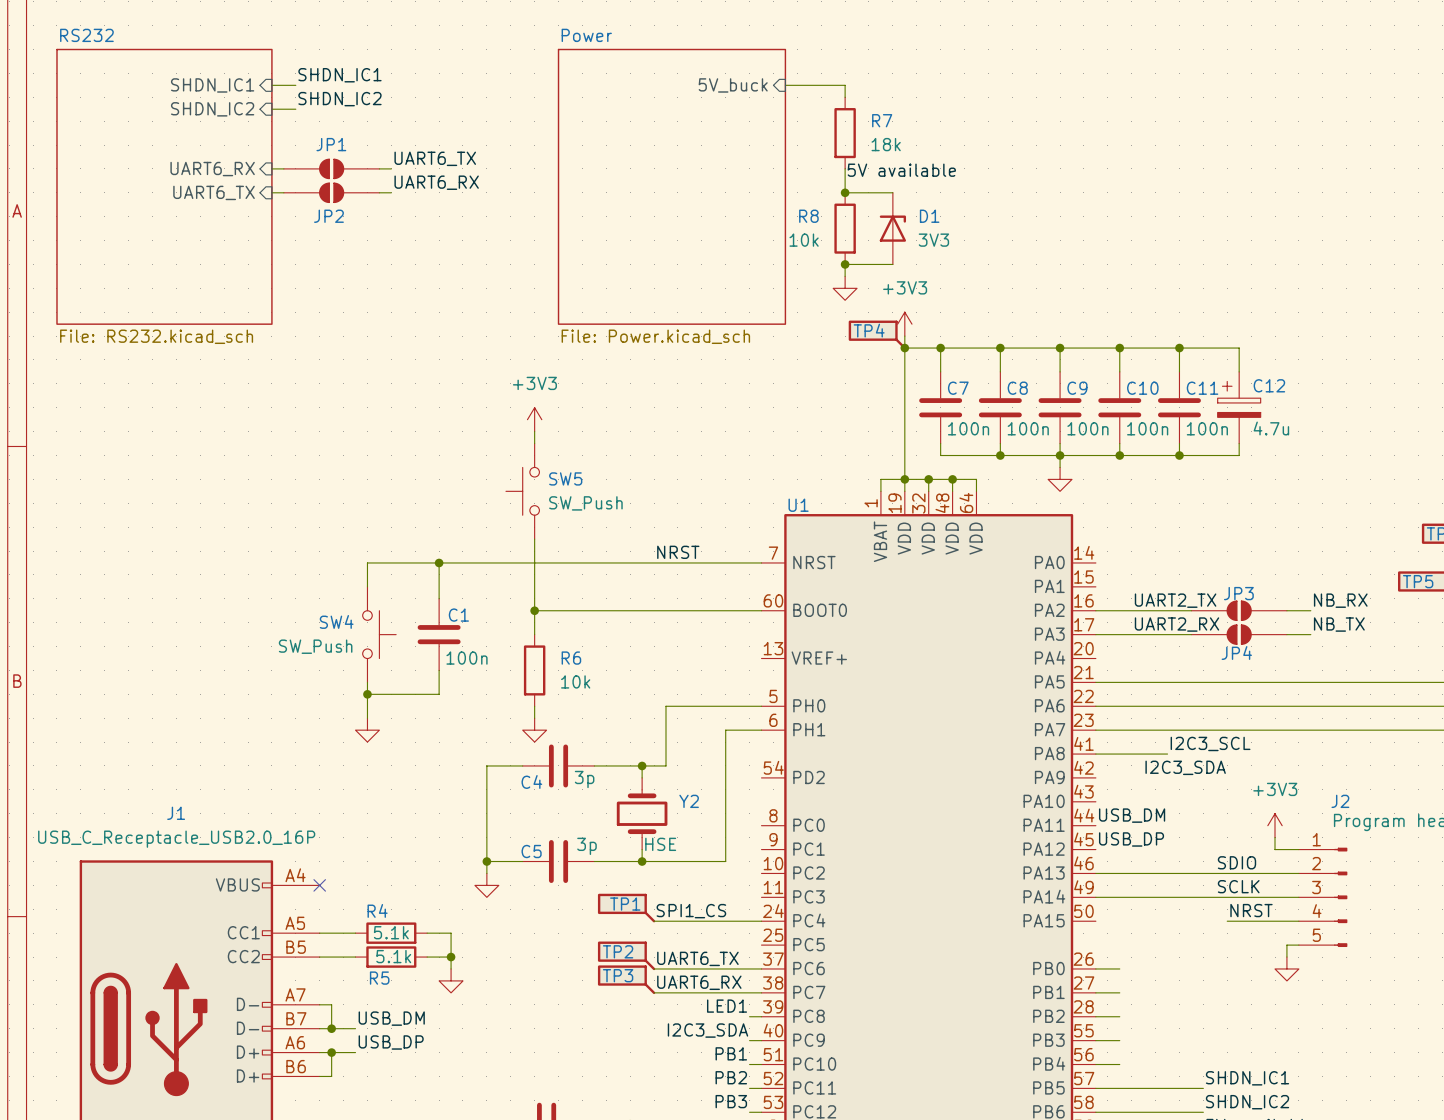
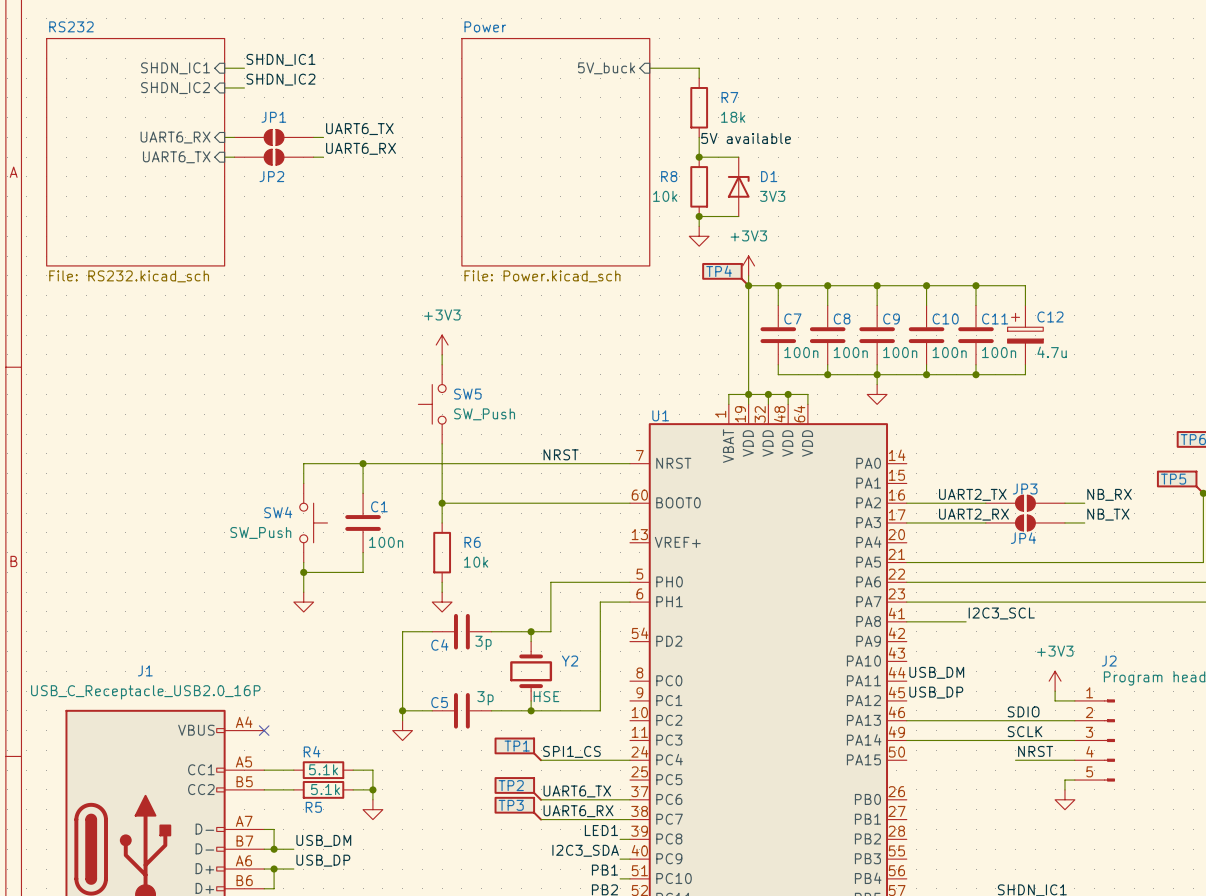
label: I2C3_SDA (1185, 767) -> none
wire: (1095, 968) (1119, 968) -> none
wire: (1095, 992) (1119, 992) -> none
wire: (1095, 1016) (1119, 1016) -> none
wire: (1095, 1040) (1119, 1040) -> none
wire: (1095, 1064) (1119, 1064) -> none

